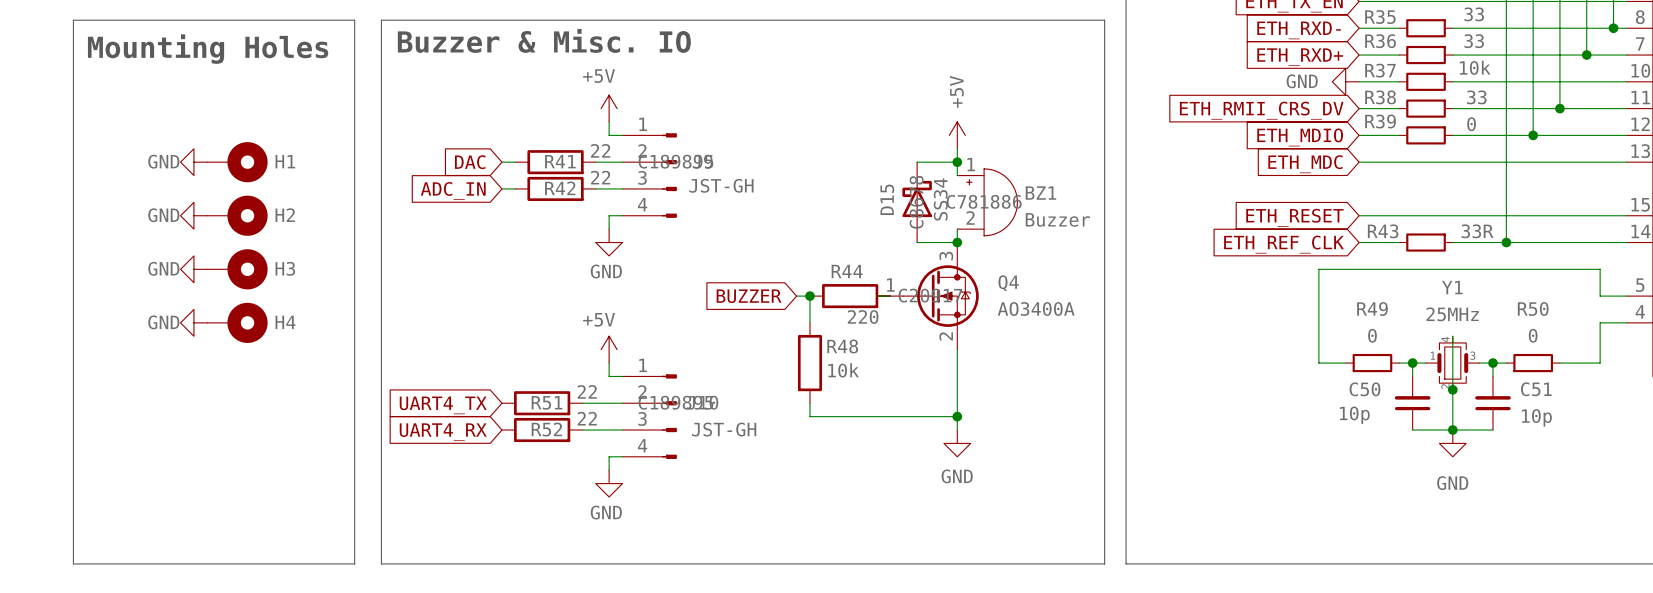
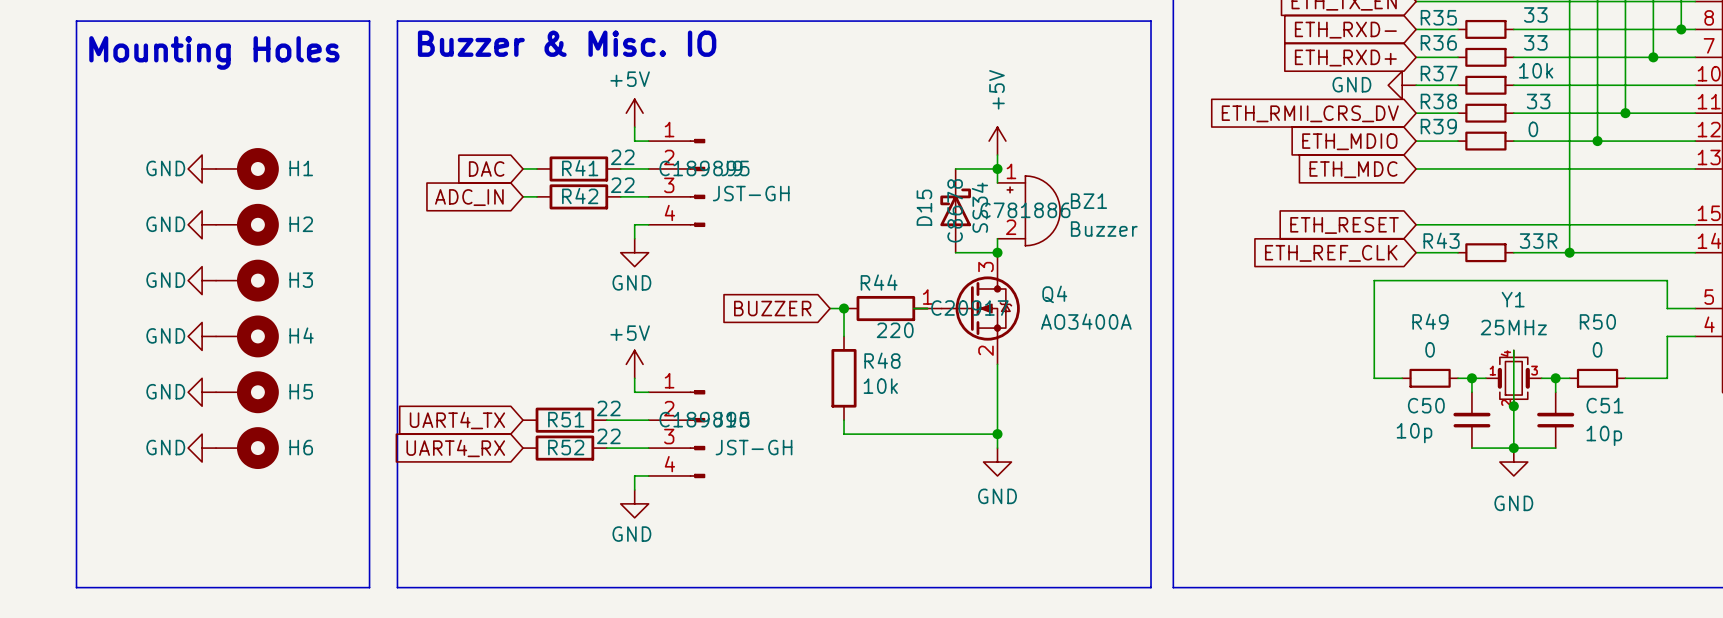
power symbol: none -> GND (202, 392)
H5: none -> (247, 392)
power symbol: none -> GND (202, 448)
H6: none -> (247, 448)

